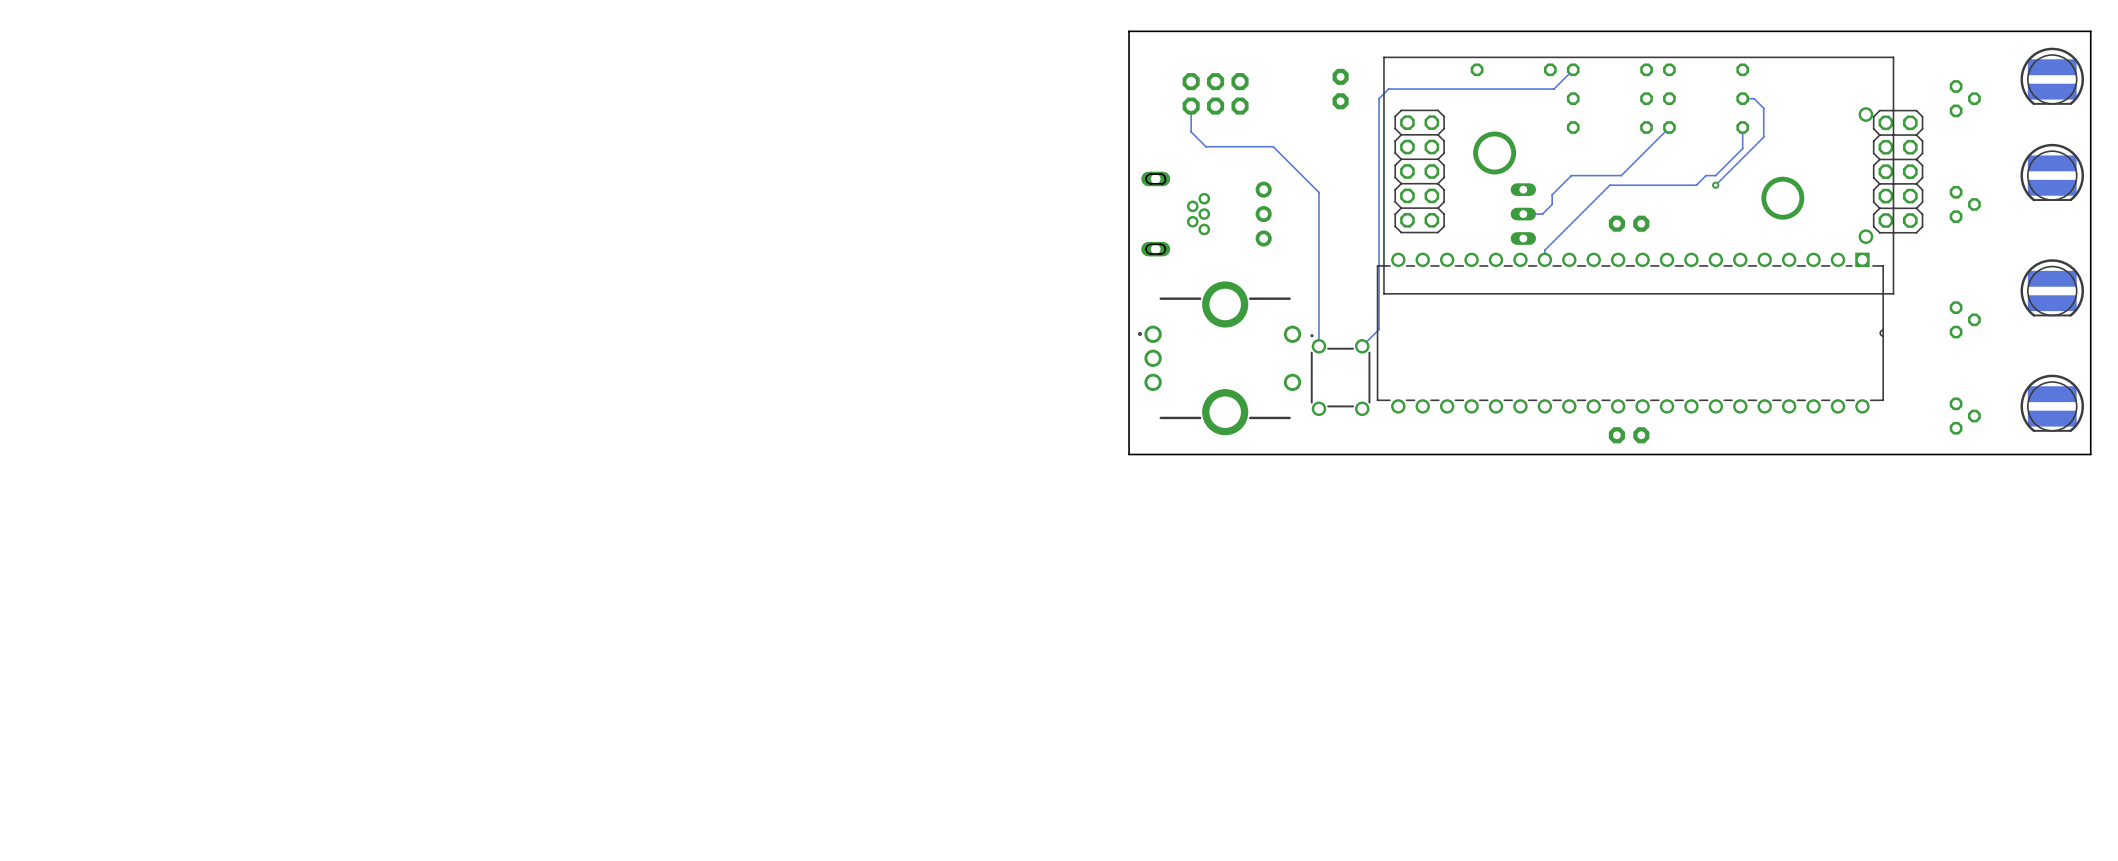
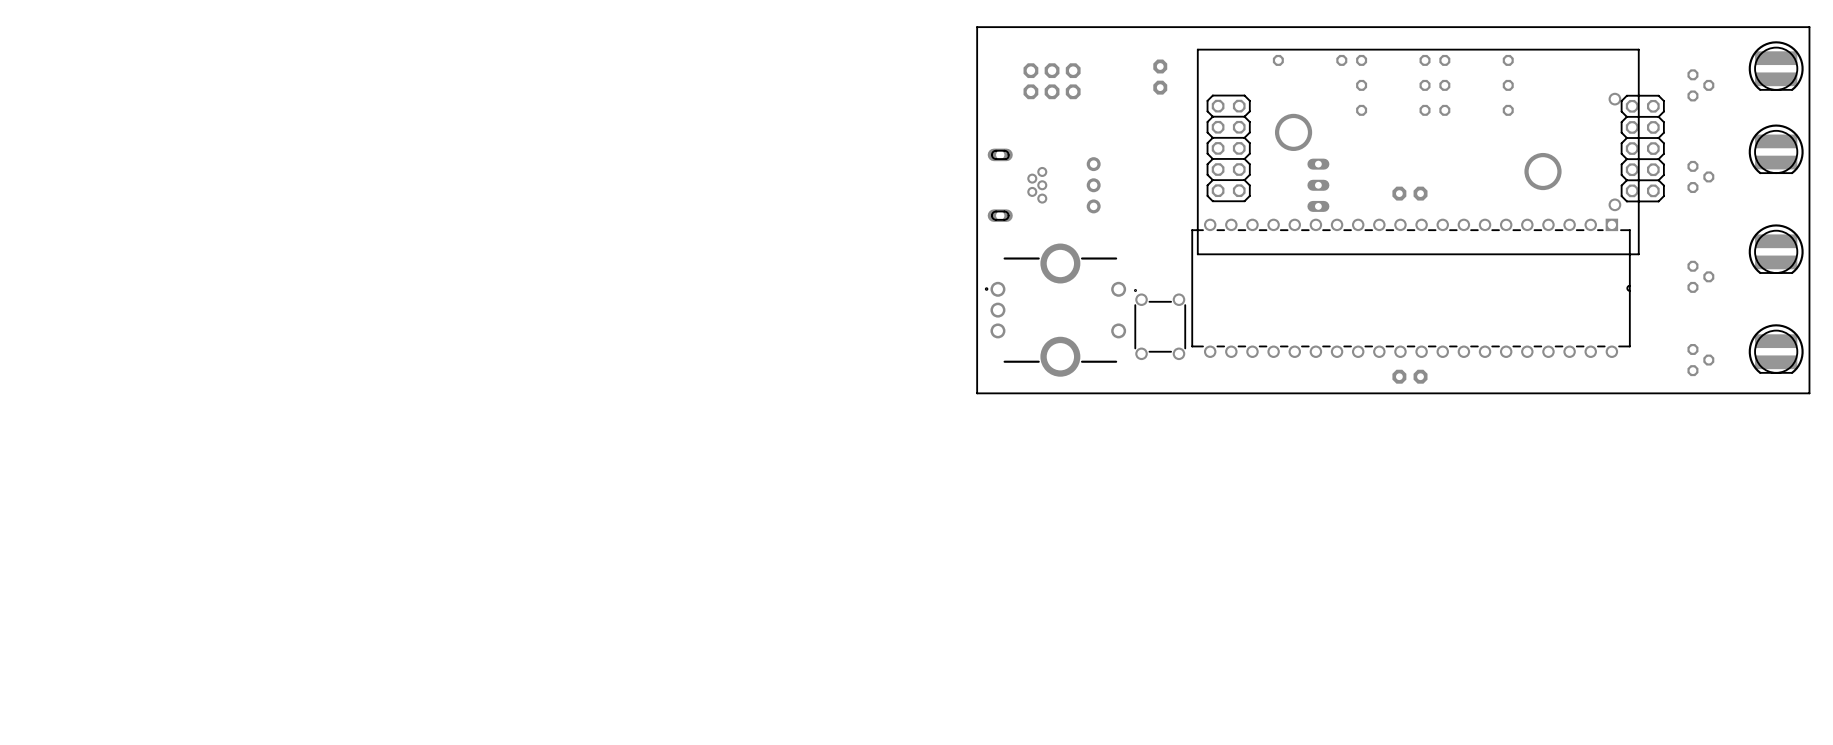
track: (1573, 69) (1554, 89) (1388, 89) (1379, 98) (1379, 329) (1362, 346) -> none
track: (1742, 98) (1754, 98) (1763, 108) (1763, 137) (1715, 185) -> none
track: (1191, 106) (1191, 131) (1205, 146) (1273, 146) (1318, 192) (1318, 346) -> none
track: (1669, 127) (1621, 175) (1571, 175) (1552, 194) (1552, 204) (1542, 214) (1523, 214) -> none
track: (1742, 127) (1742, 148) (1715, 175) (1706, 175) (1696, 185) (1609, 185) (1544, 250) (1544, 259) -> none
via: (1715, 185) -> none

